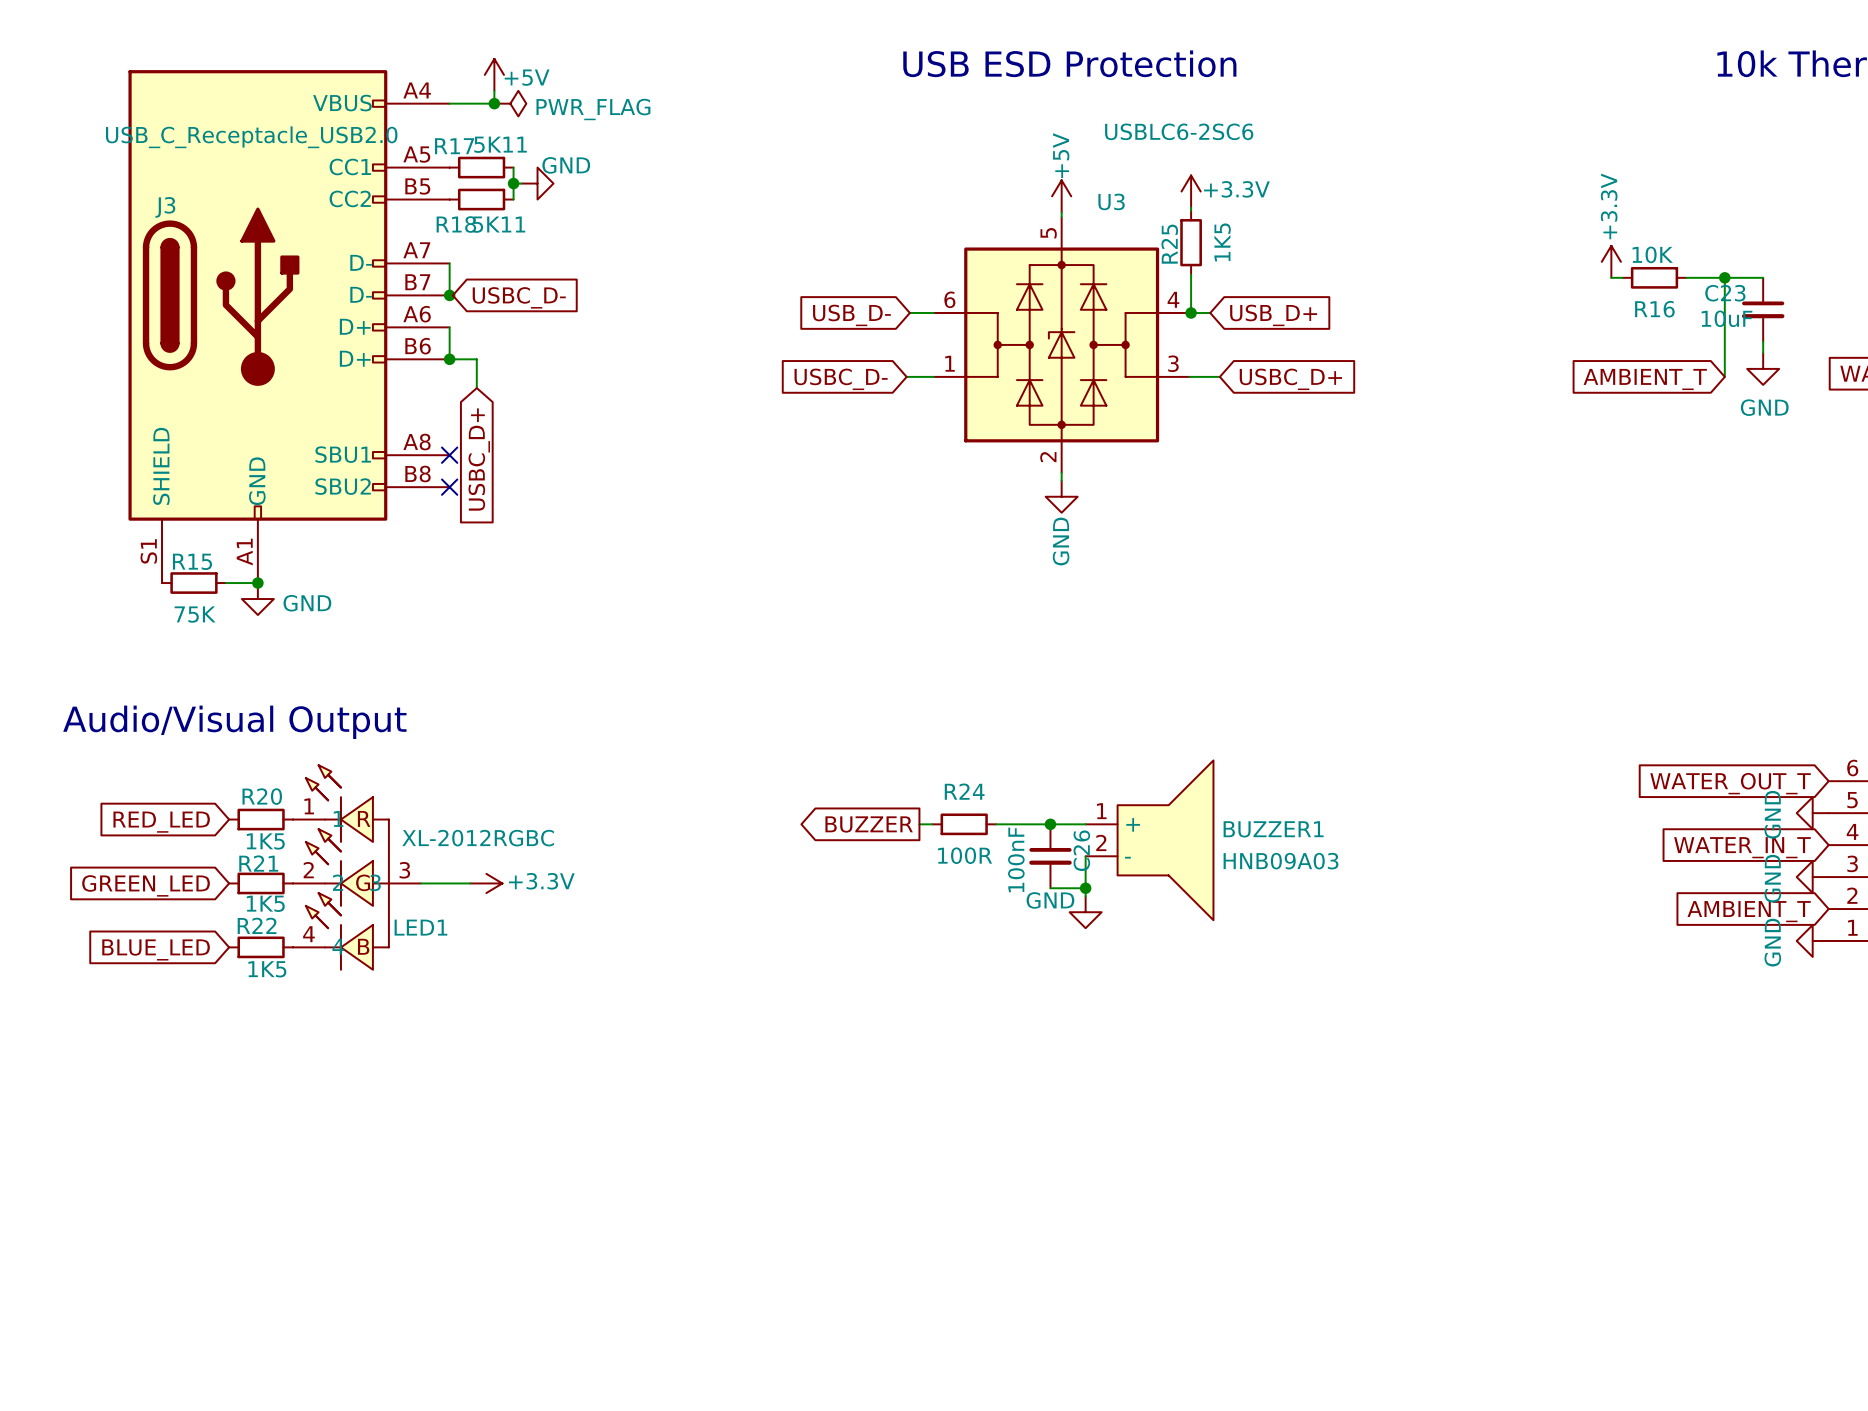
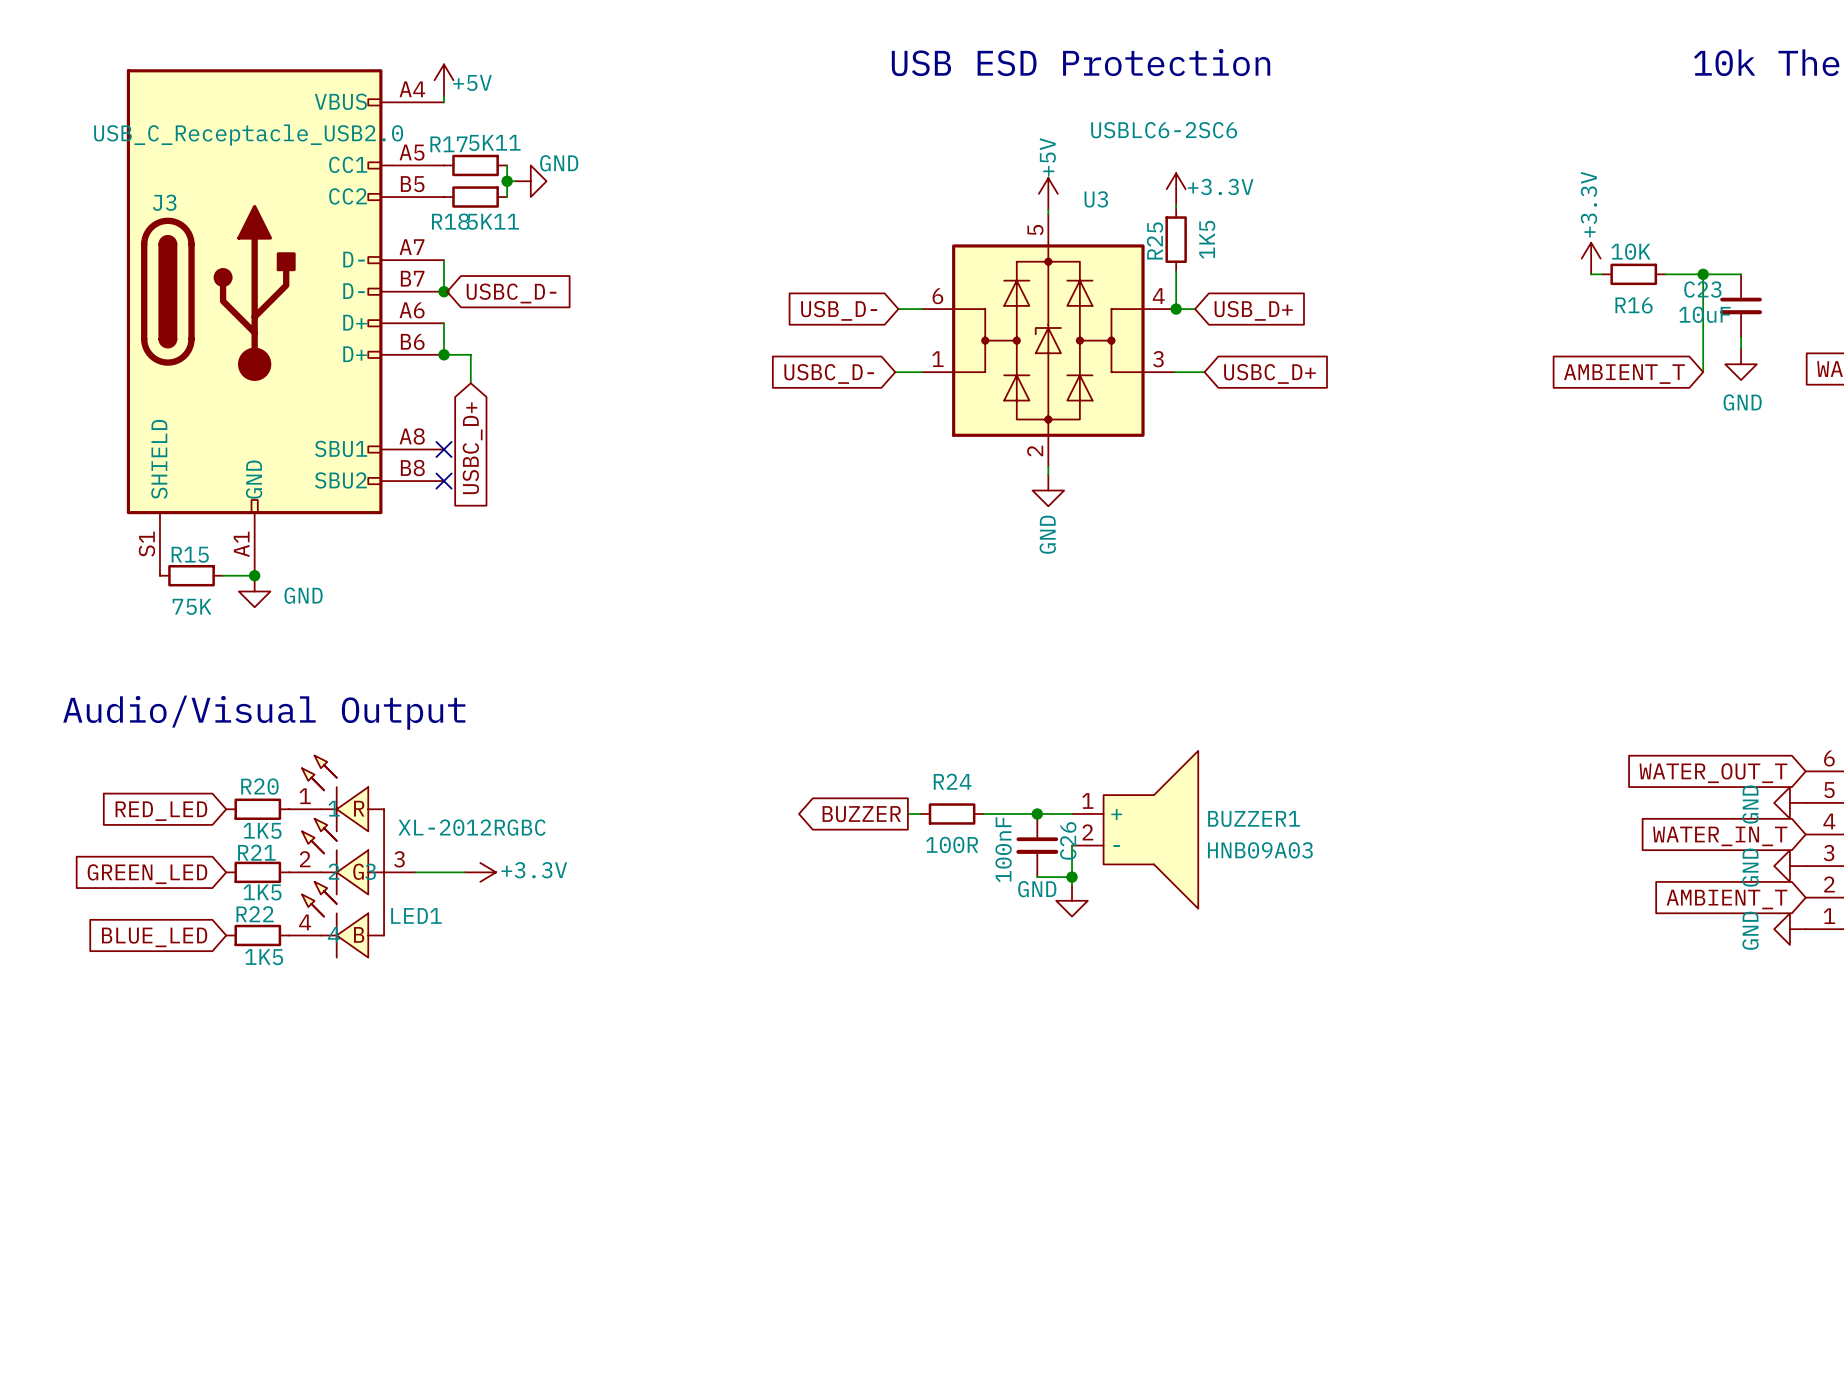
power symbol position: +5V (494, 74) -> +5V (444, 80)
wire: (494, 90) (494, 103) (449, 103) -> (444, 96) (444, 102)
junction: (494, 103) -> none
power symbol: PWR_FLAG (510, 103) -> none

